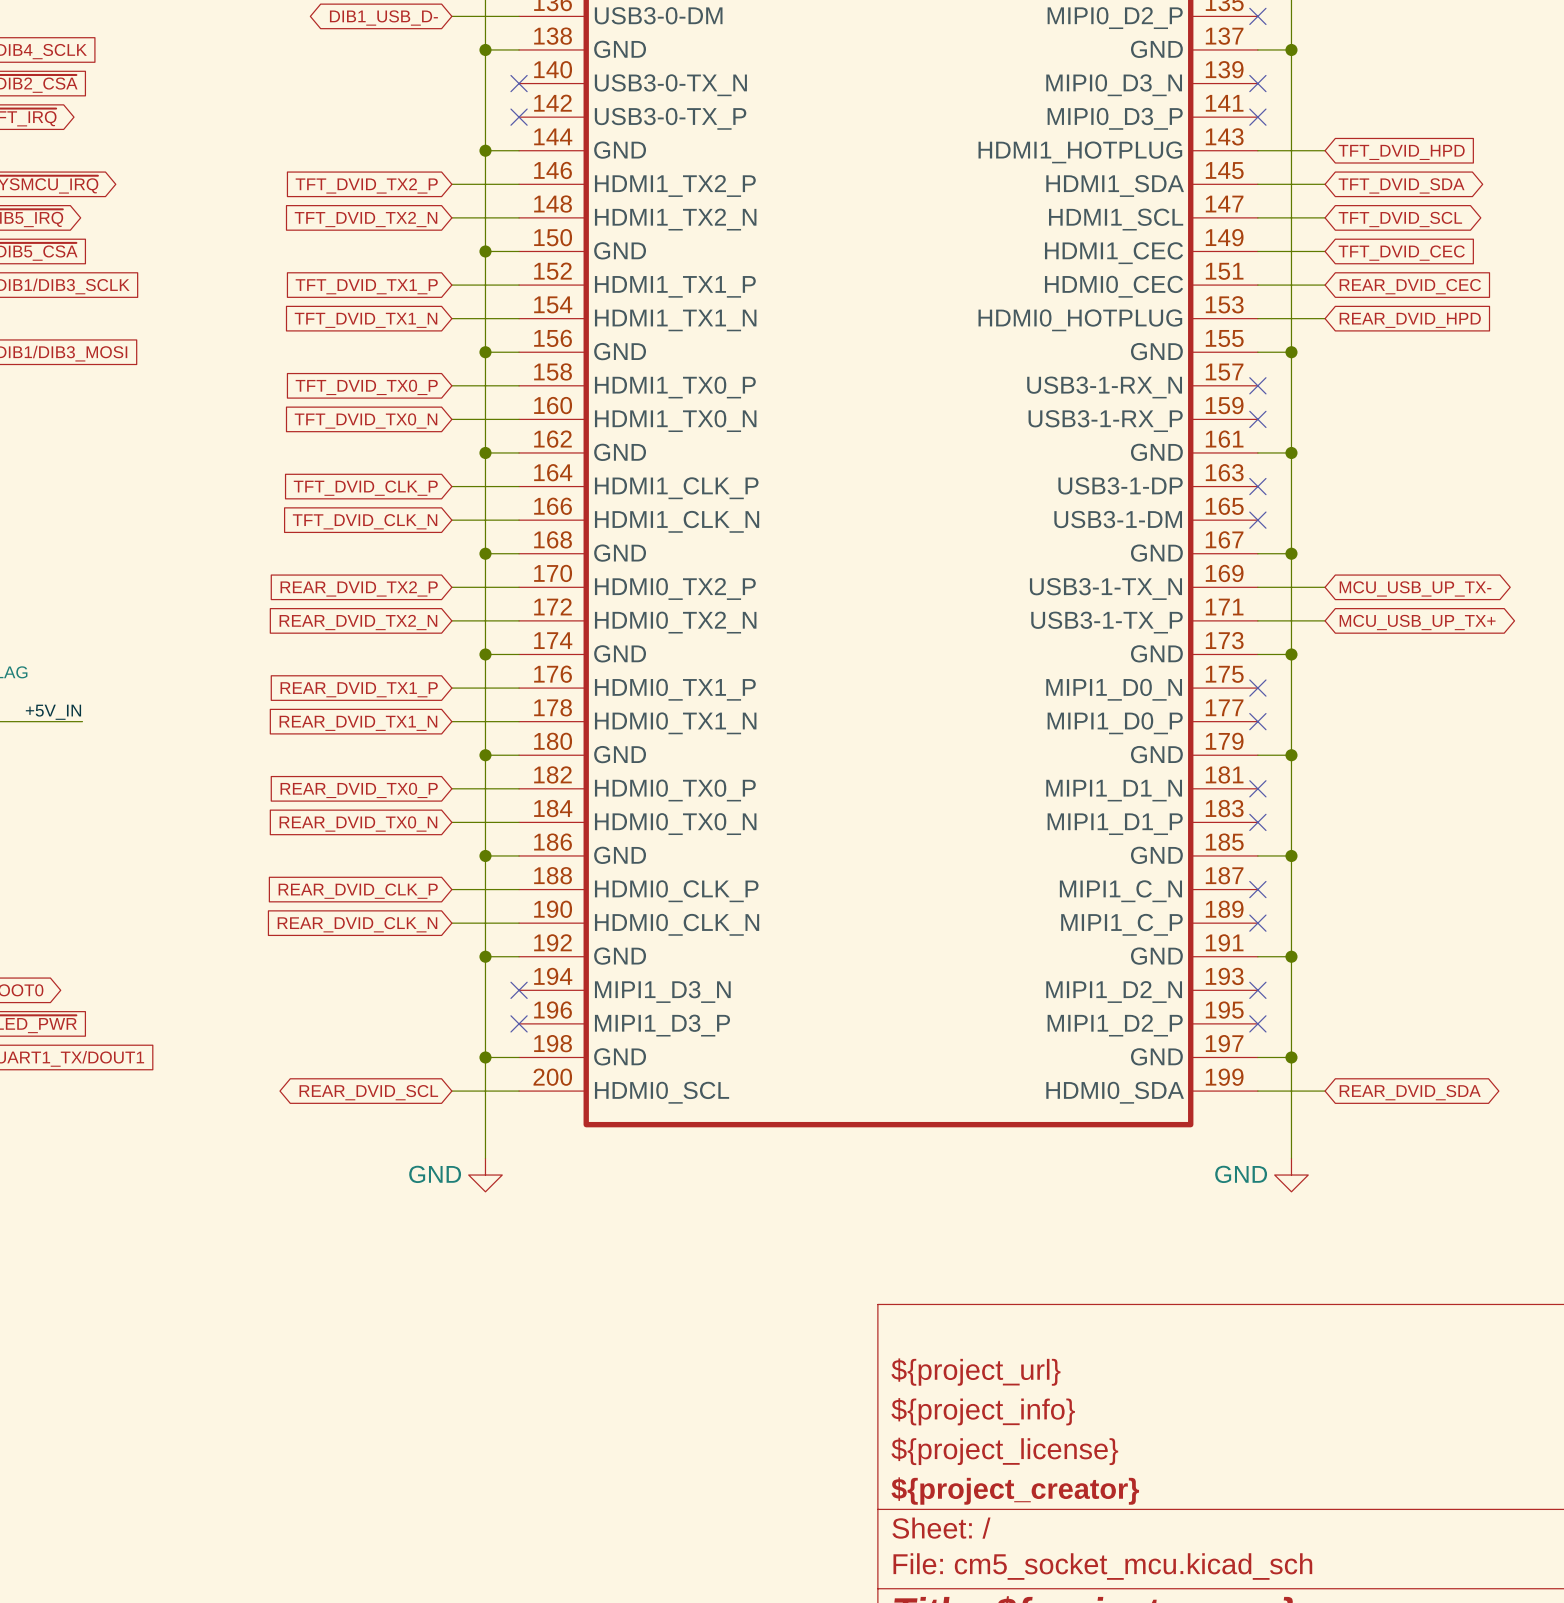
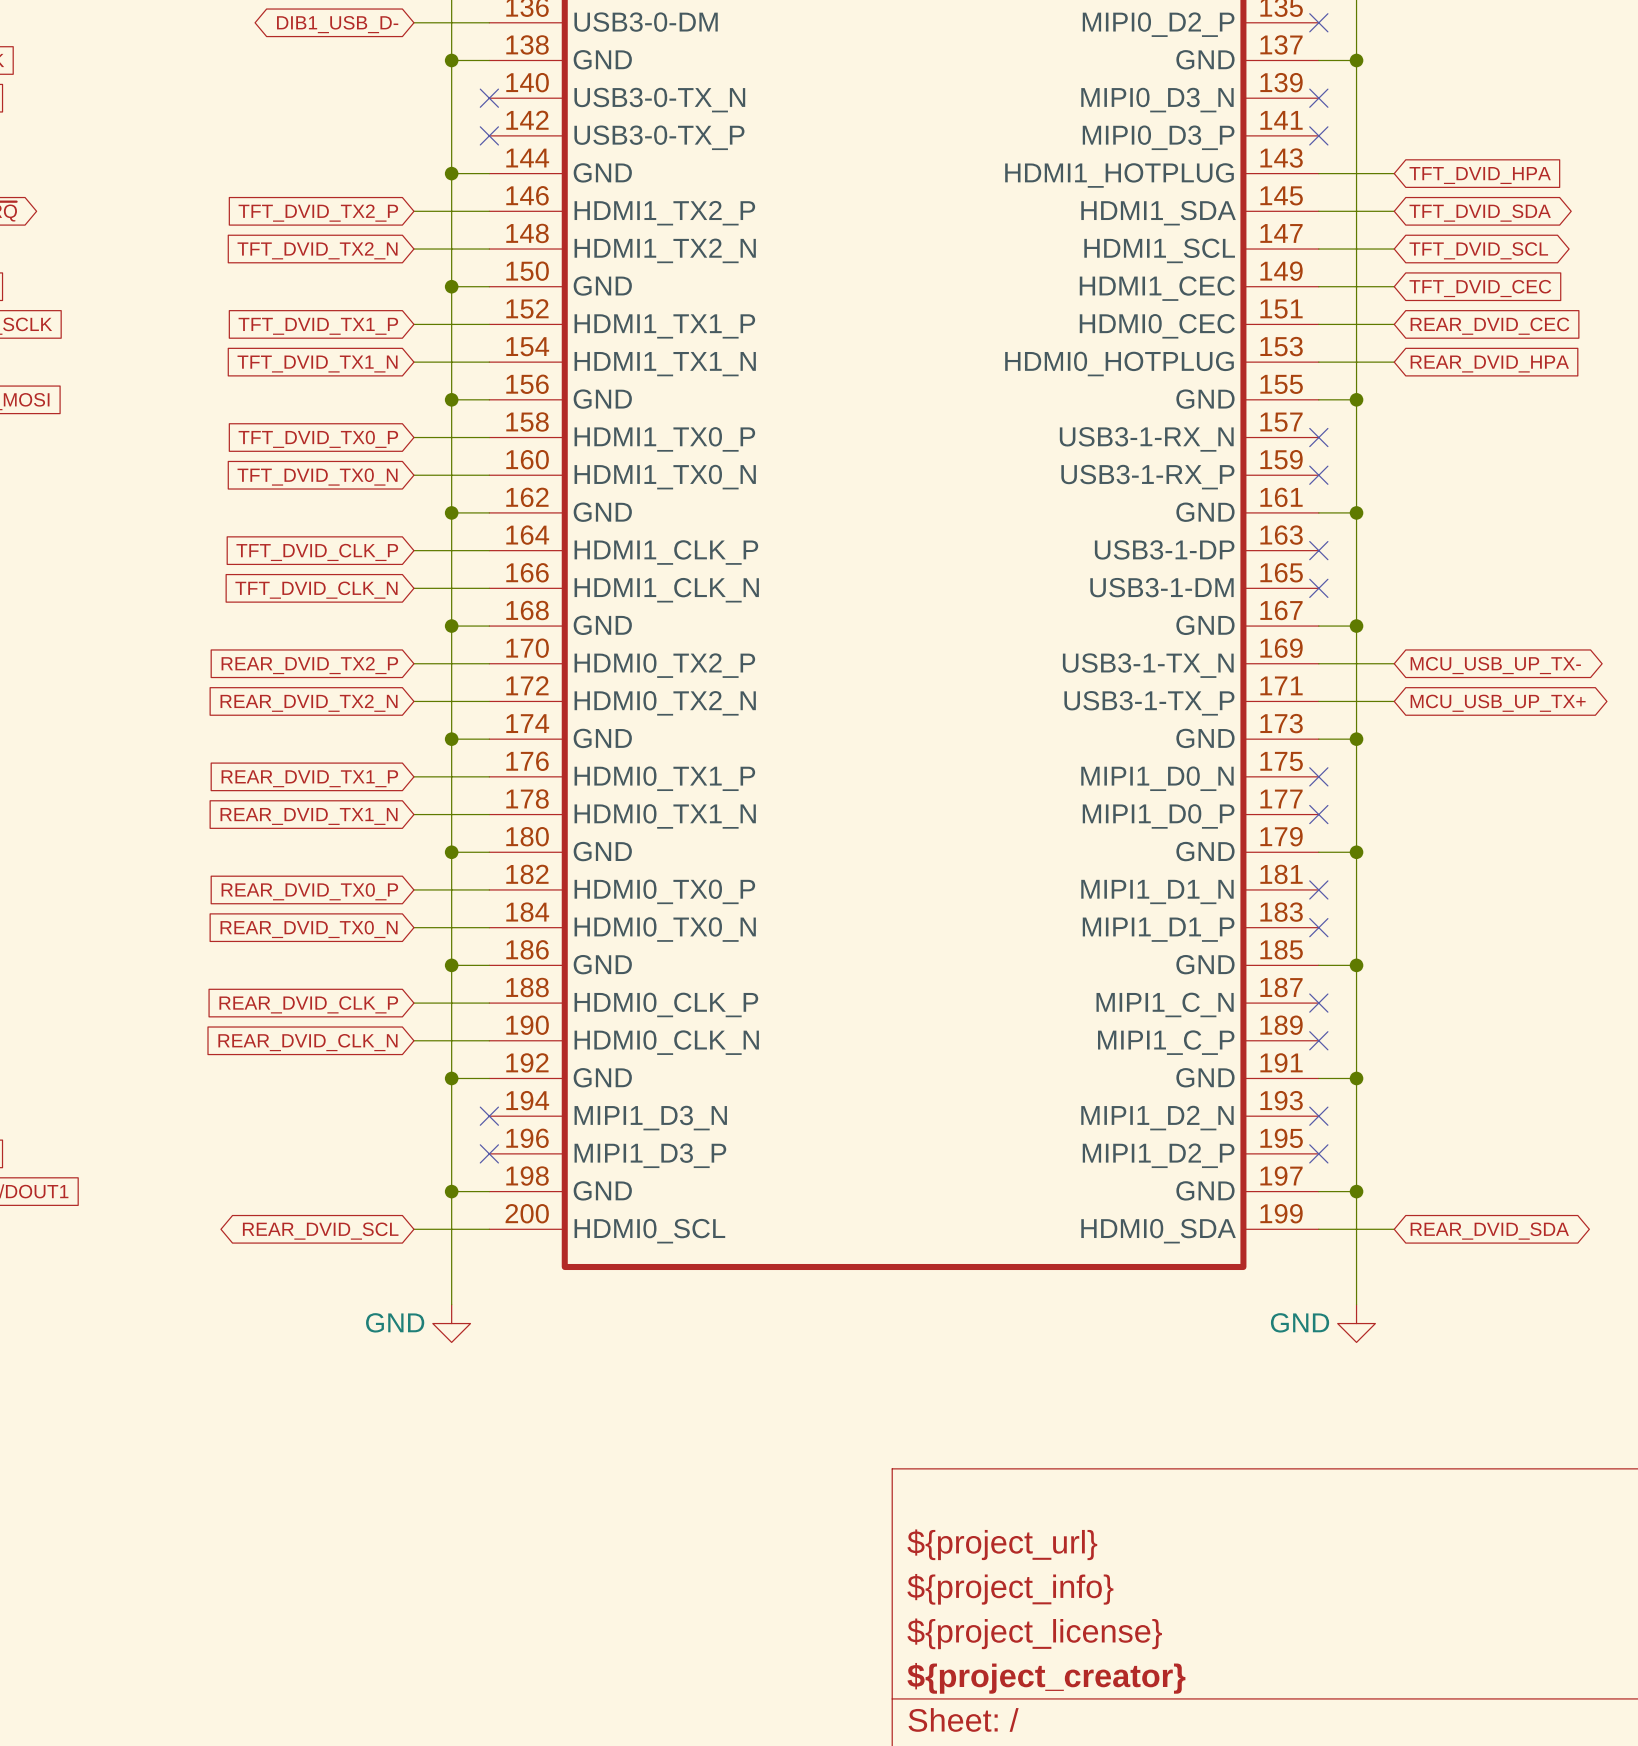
global label: TFT_DVID_HPD (1401, 152) -> TFT_DVID_HPA (1480, 175)
global label: REAR_DVID_HPD (1410, 320) -> REAR_DVID_HPA (1489, 364)

